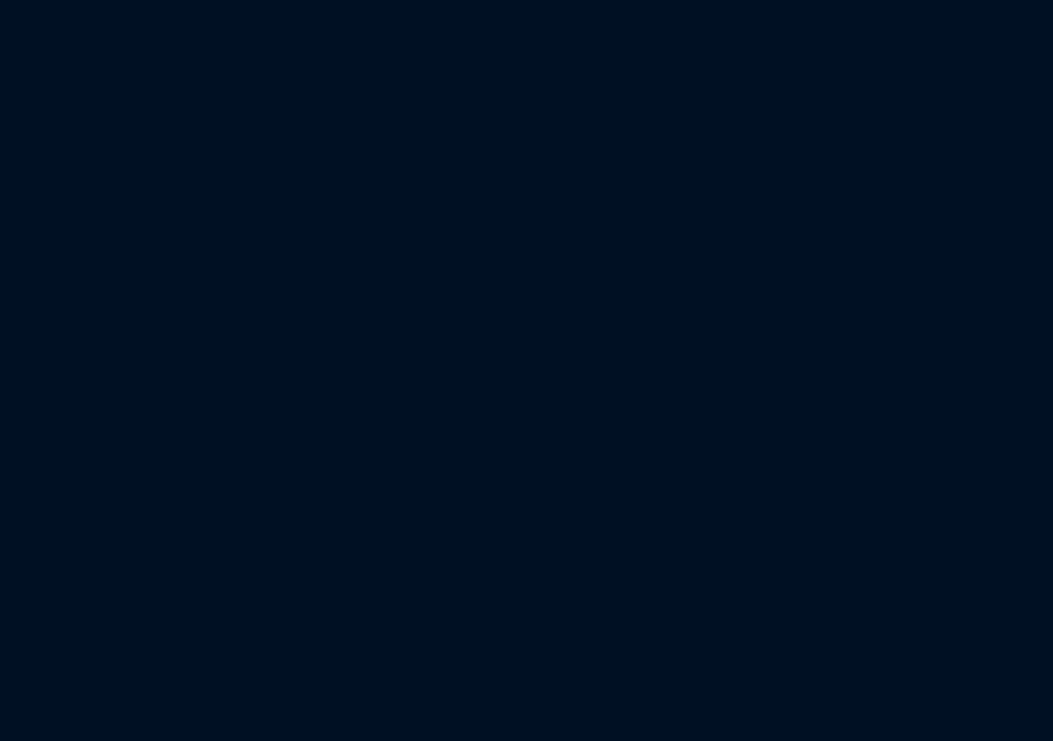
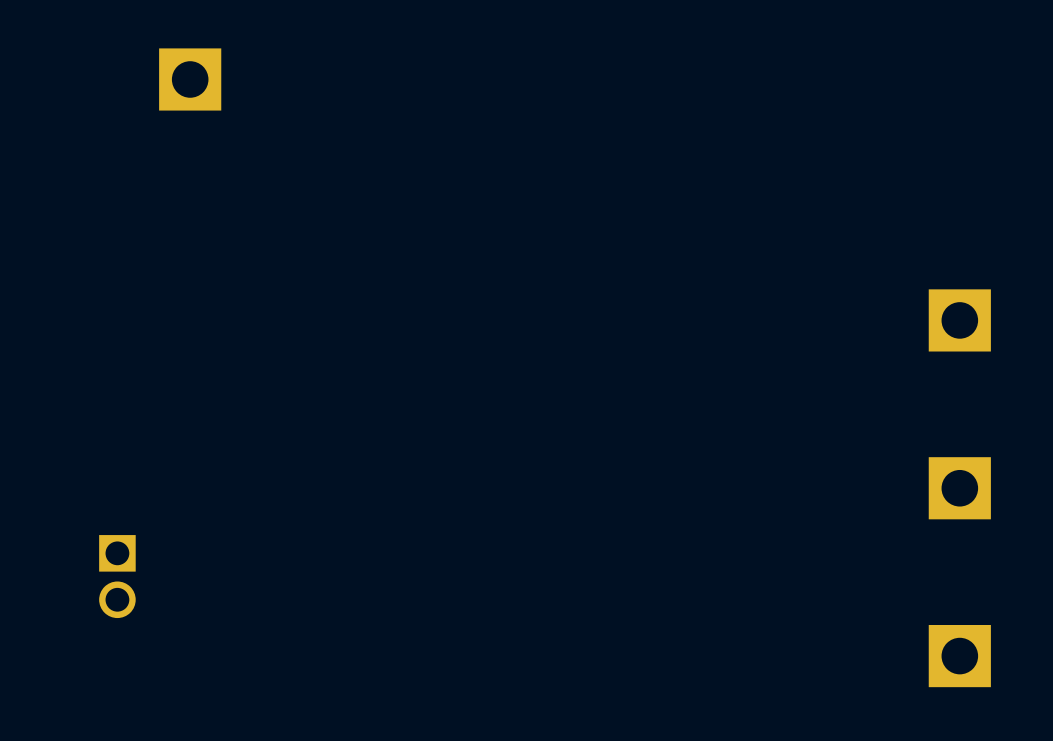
part: none -> (190, 79)
part: none -> (959, 320)
part: none -> (959, 488)
part: none -> (117, 576)
part: none -> (959, 656)

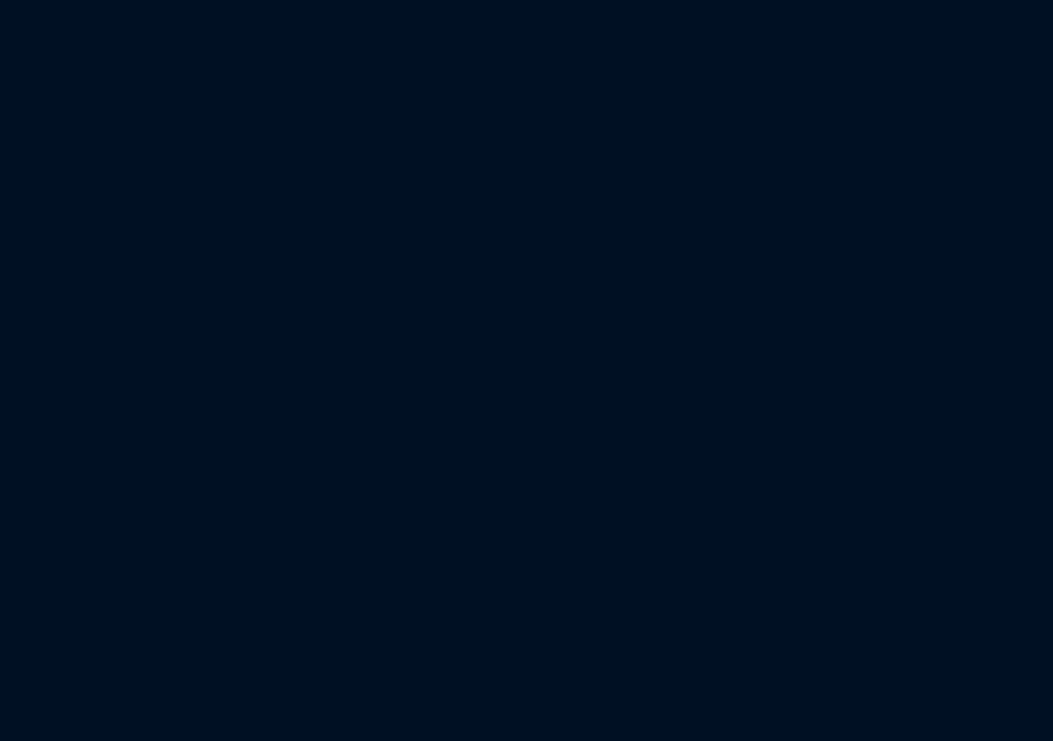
part: (190, 79) -> none
part: (959, 320) -> none
part: (959, 488) -> none
part: (117, 576) -> none
part: (959, 656) -> none

